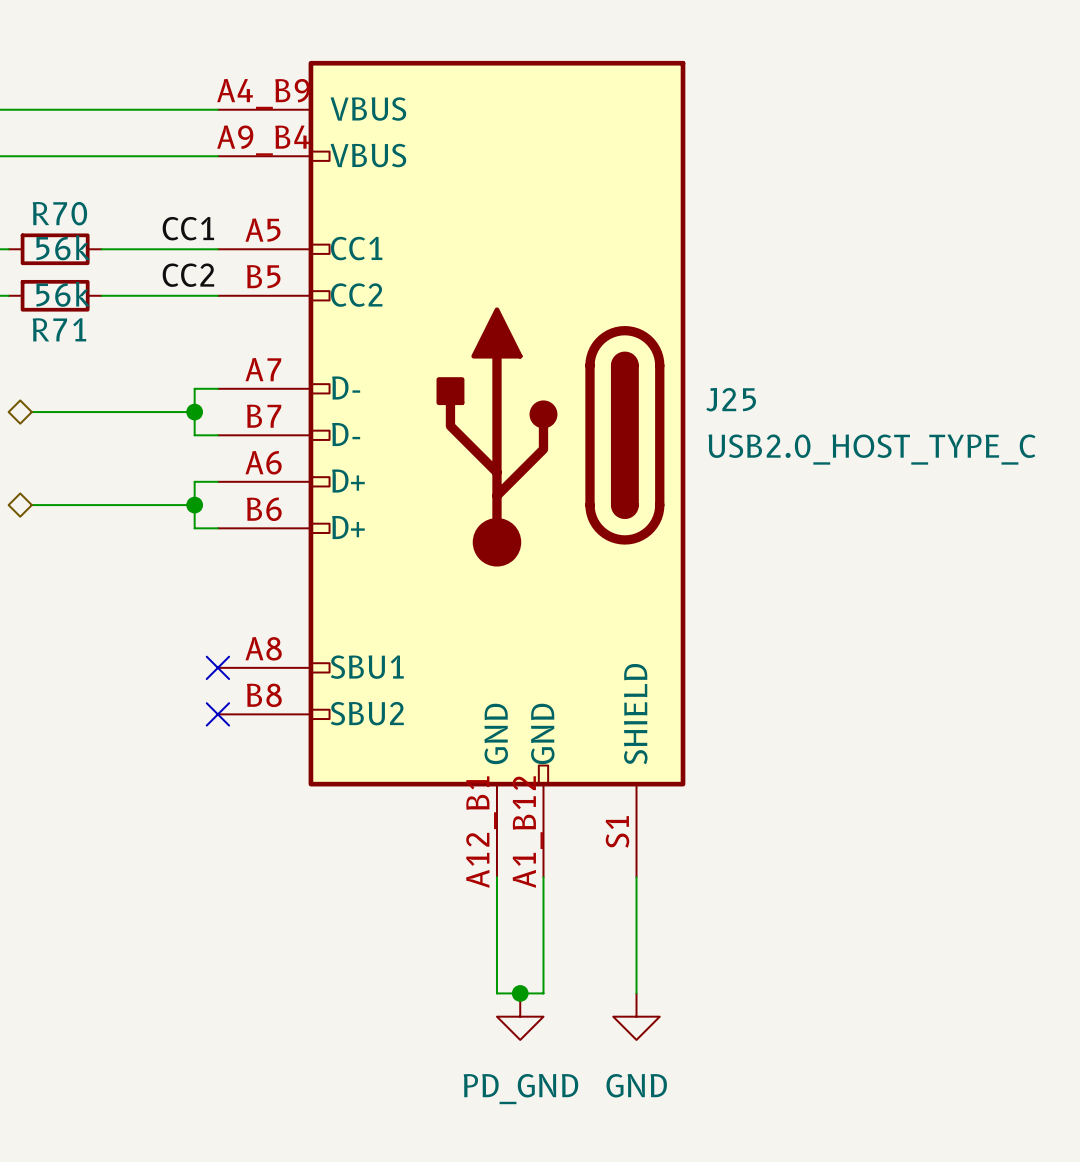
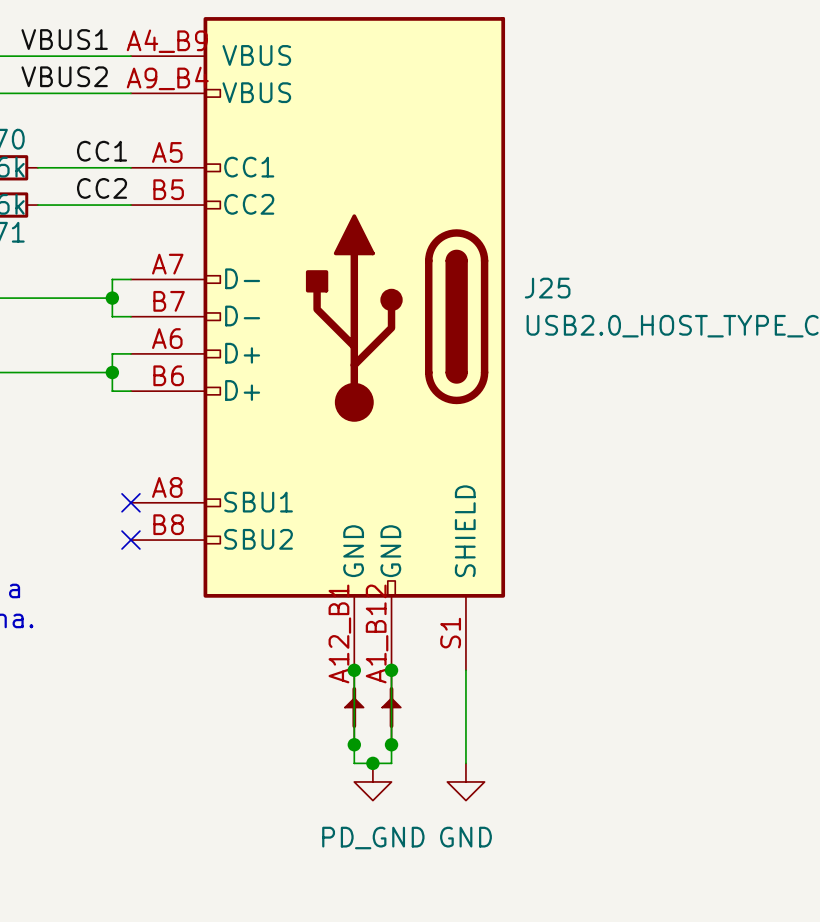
label: none -> VBUS1 (64, 39)
label: none -> VBUS2 (64, 76)
junction: none -> (354, 670)
junction: none -> (391, 670)
part: none -> (354, 707)
part: none -> (391, 707)
junction: none -> (354, 744)
junction: none -> (391, 744)

